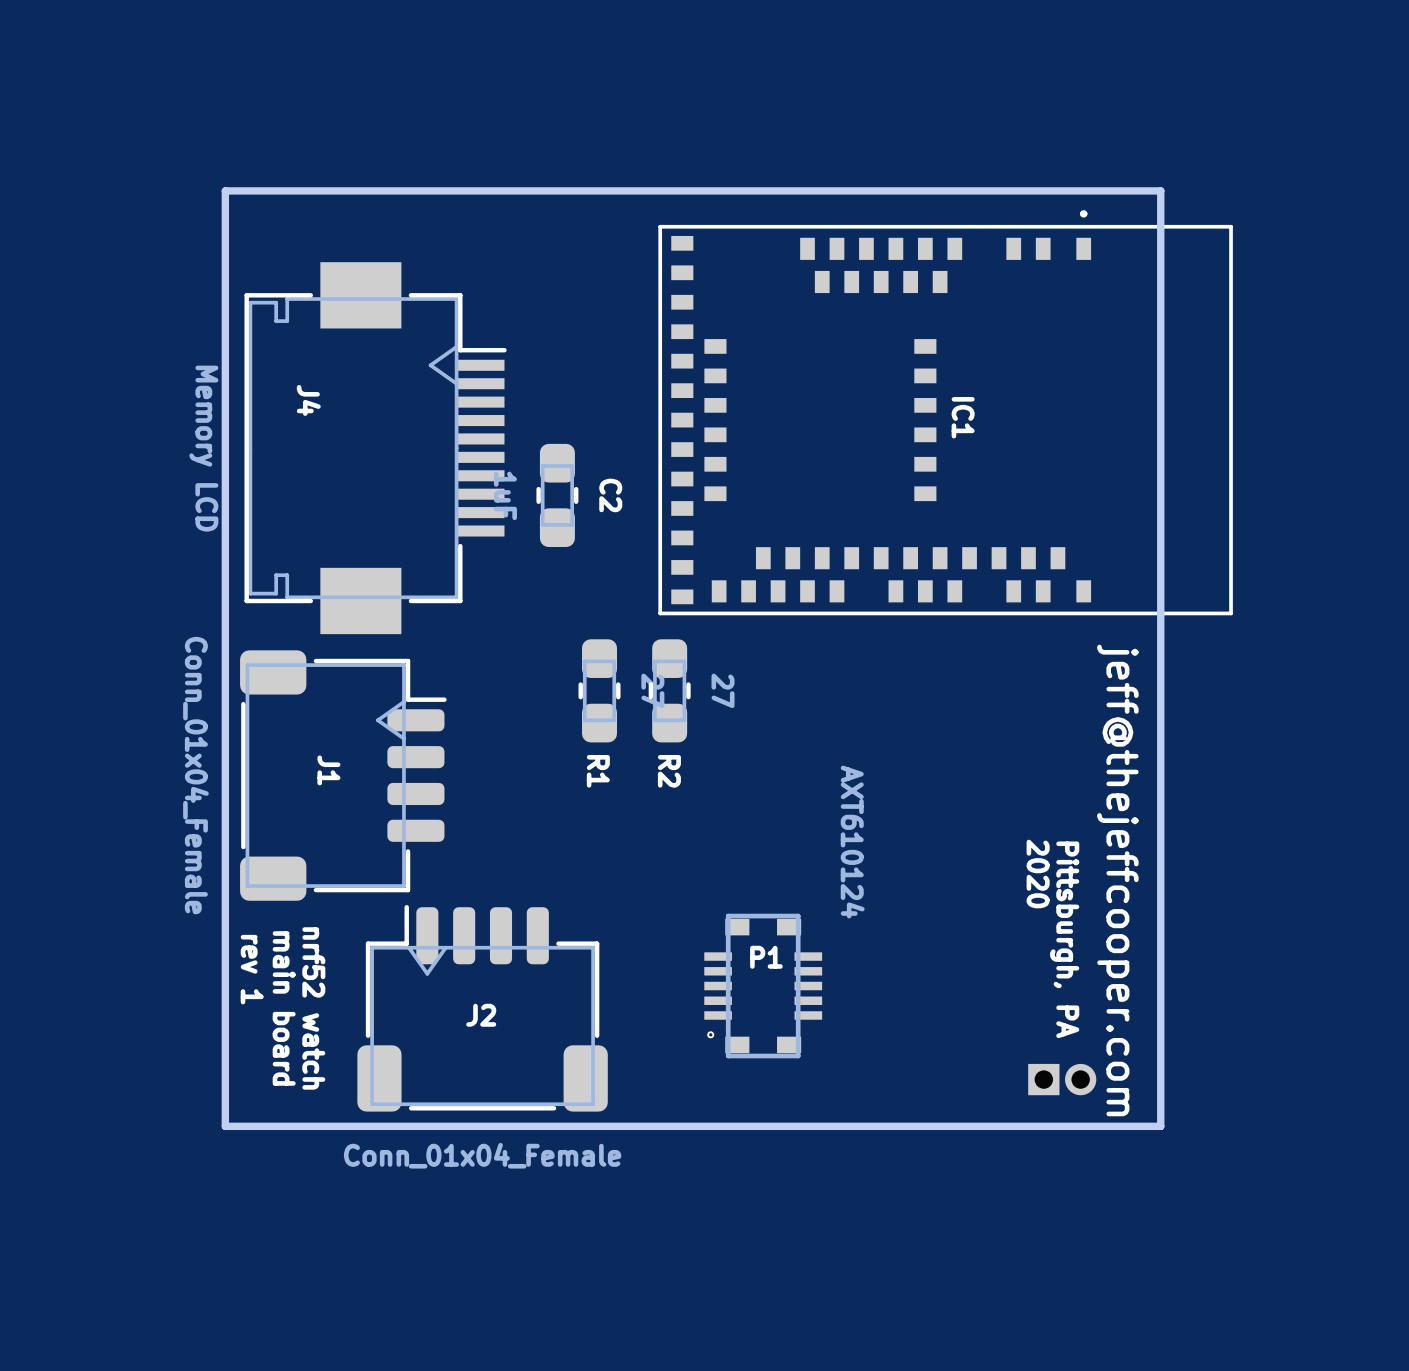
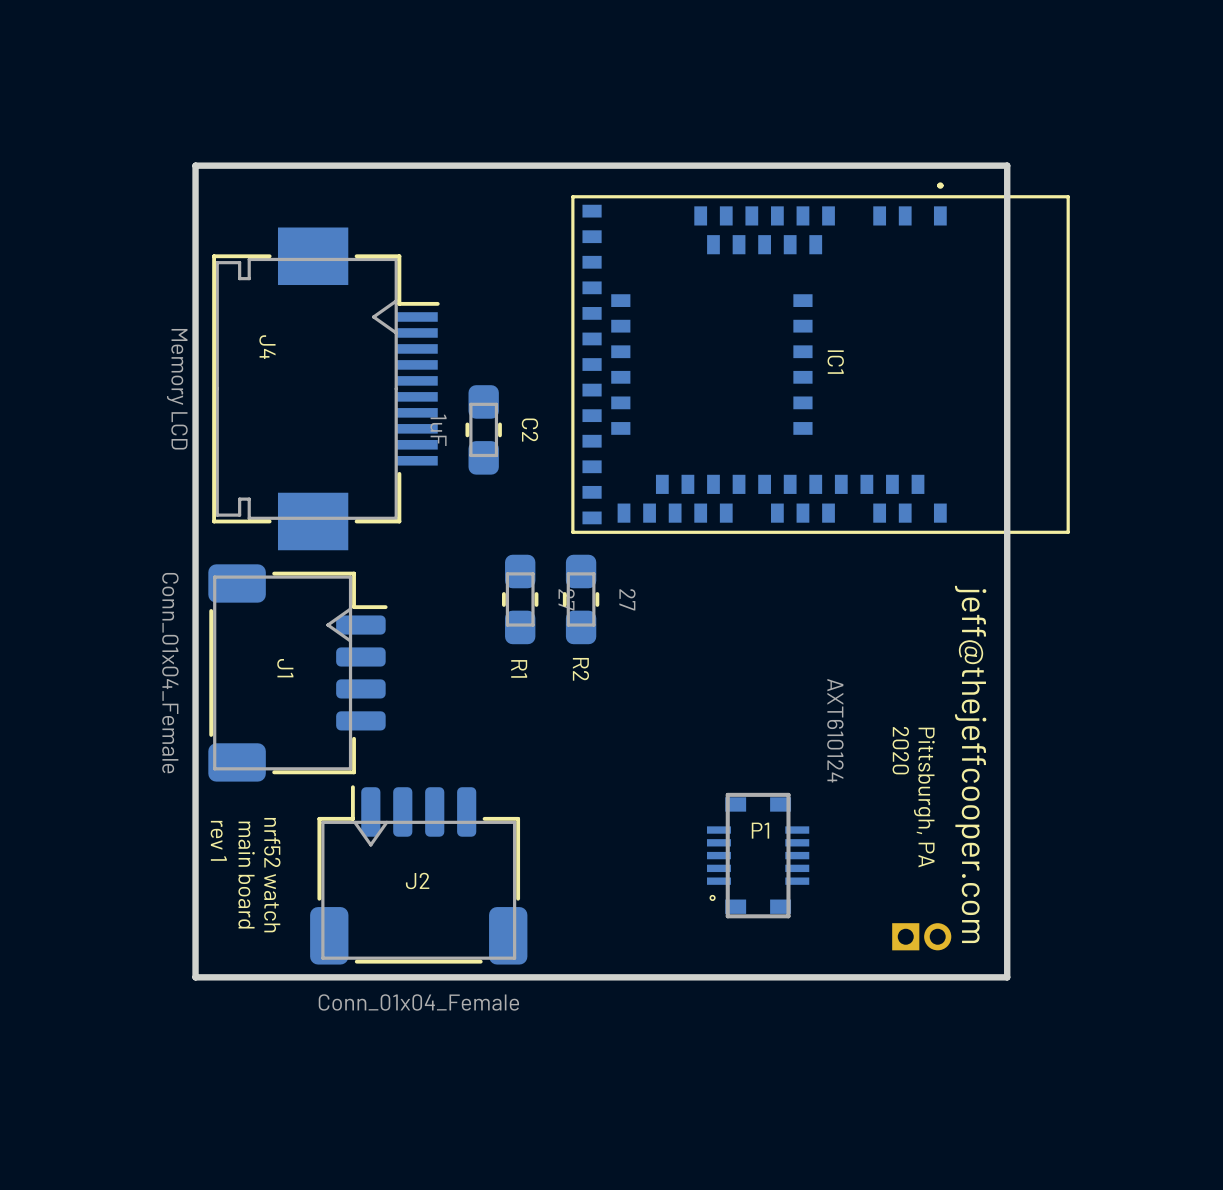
P1 position: (763, 986) -> (758, 855)

